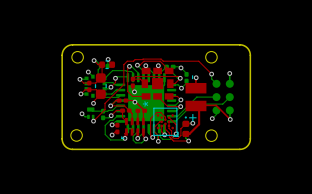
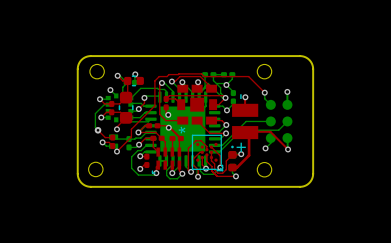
bottom track: none -> (205, 74) (205, 88) (199, 93)
part: none -> (209, 74)
bottom track: none -> (223, 74) (213, 74) (213, 80) (220, 87) (220, 93) (225, 97)
part: none -> (228, 74)
bottom track: none -> (232, 74) (232, 79) (226, 84)
part: (169, 66) -> none
bottom track: none -> (108, 104) (104, 104) (95, 113) (95, 127) (98, 130)
top track: none -> (98, 130) (105, 137) (112, 137)
via: none -> (98, 130)
top track: none -> (102, 142) (109, 142) (112, 145)
part: none -> (112, 141)

